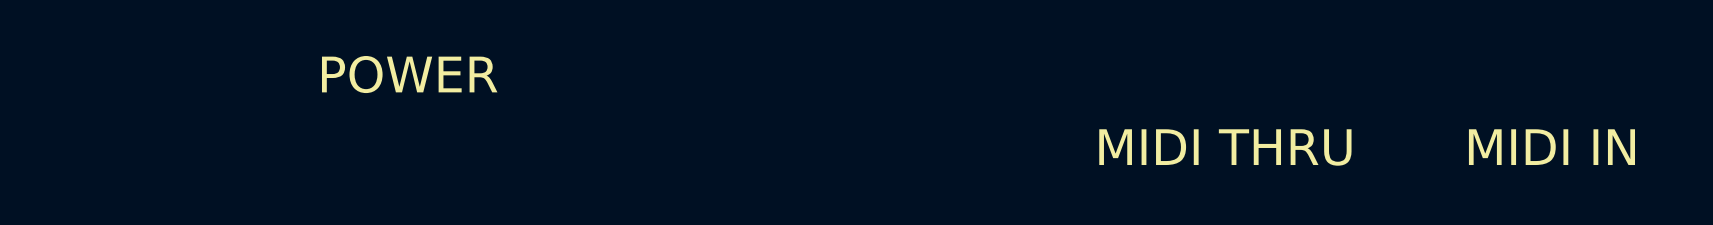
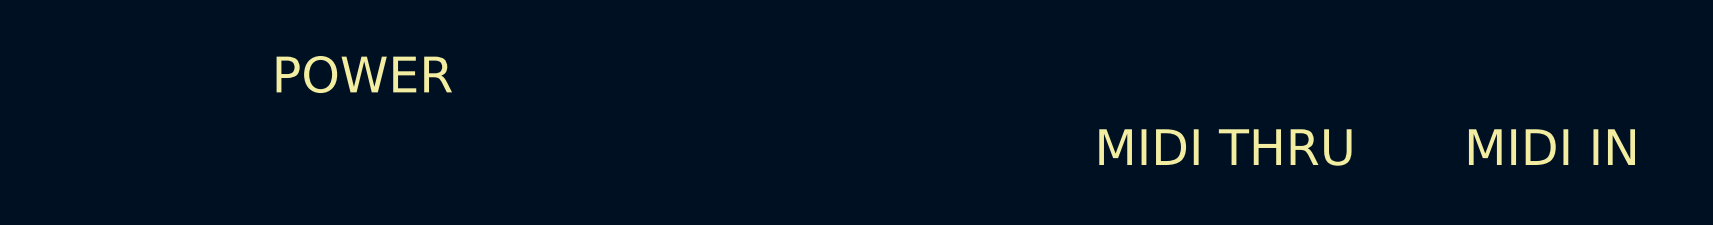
text position: POWER (409, 74) -> POWER (364, 74)

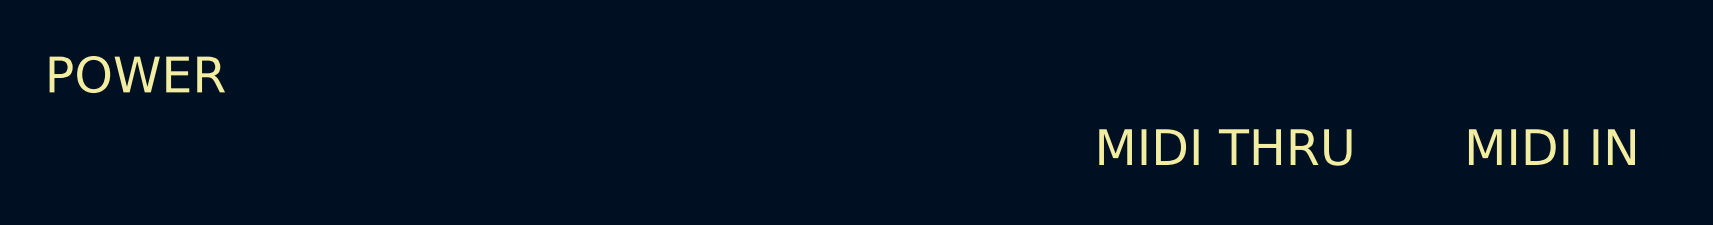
text: none -> POWER (137, 74)
text: POWER (364, 74) -> none

